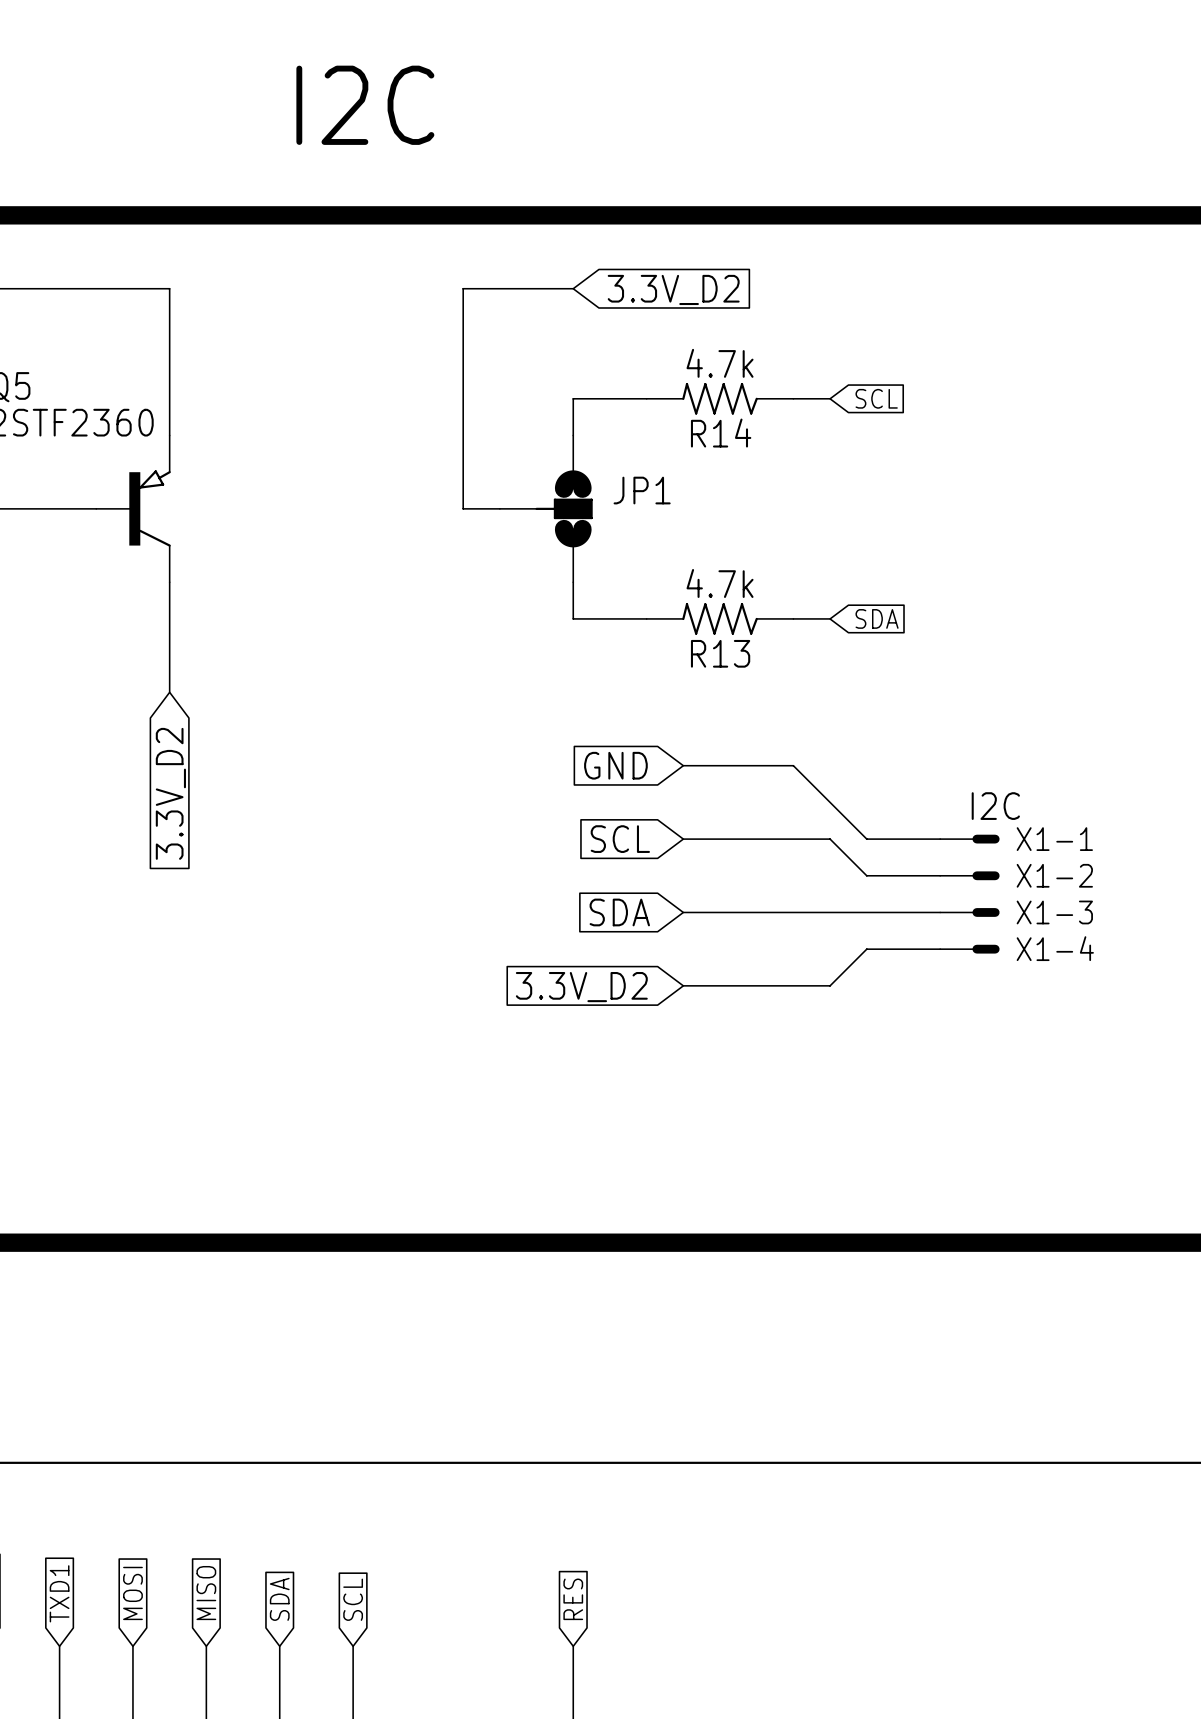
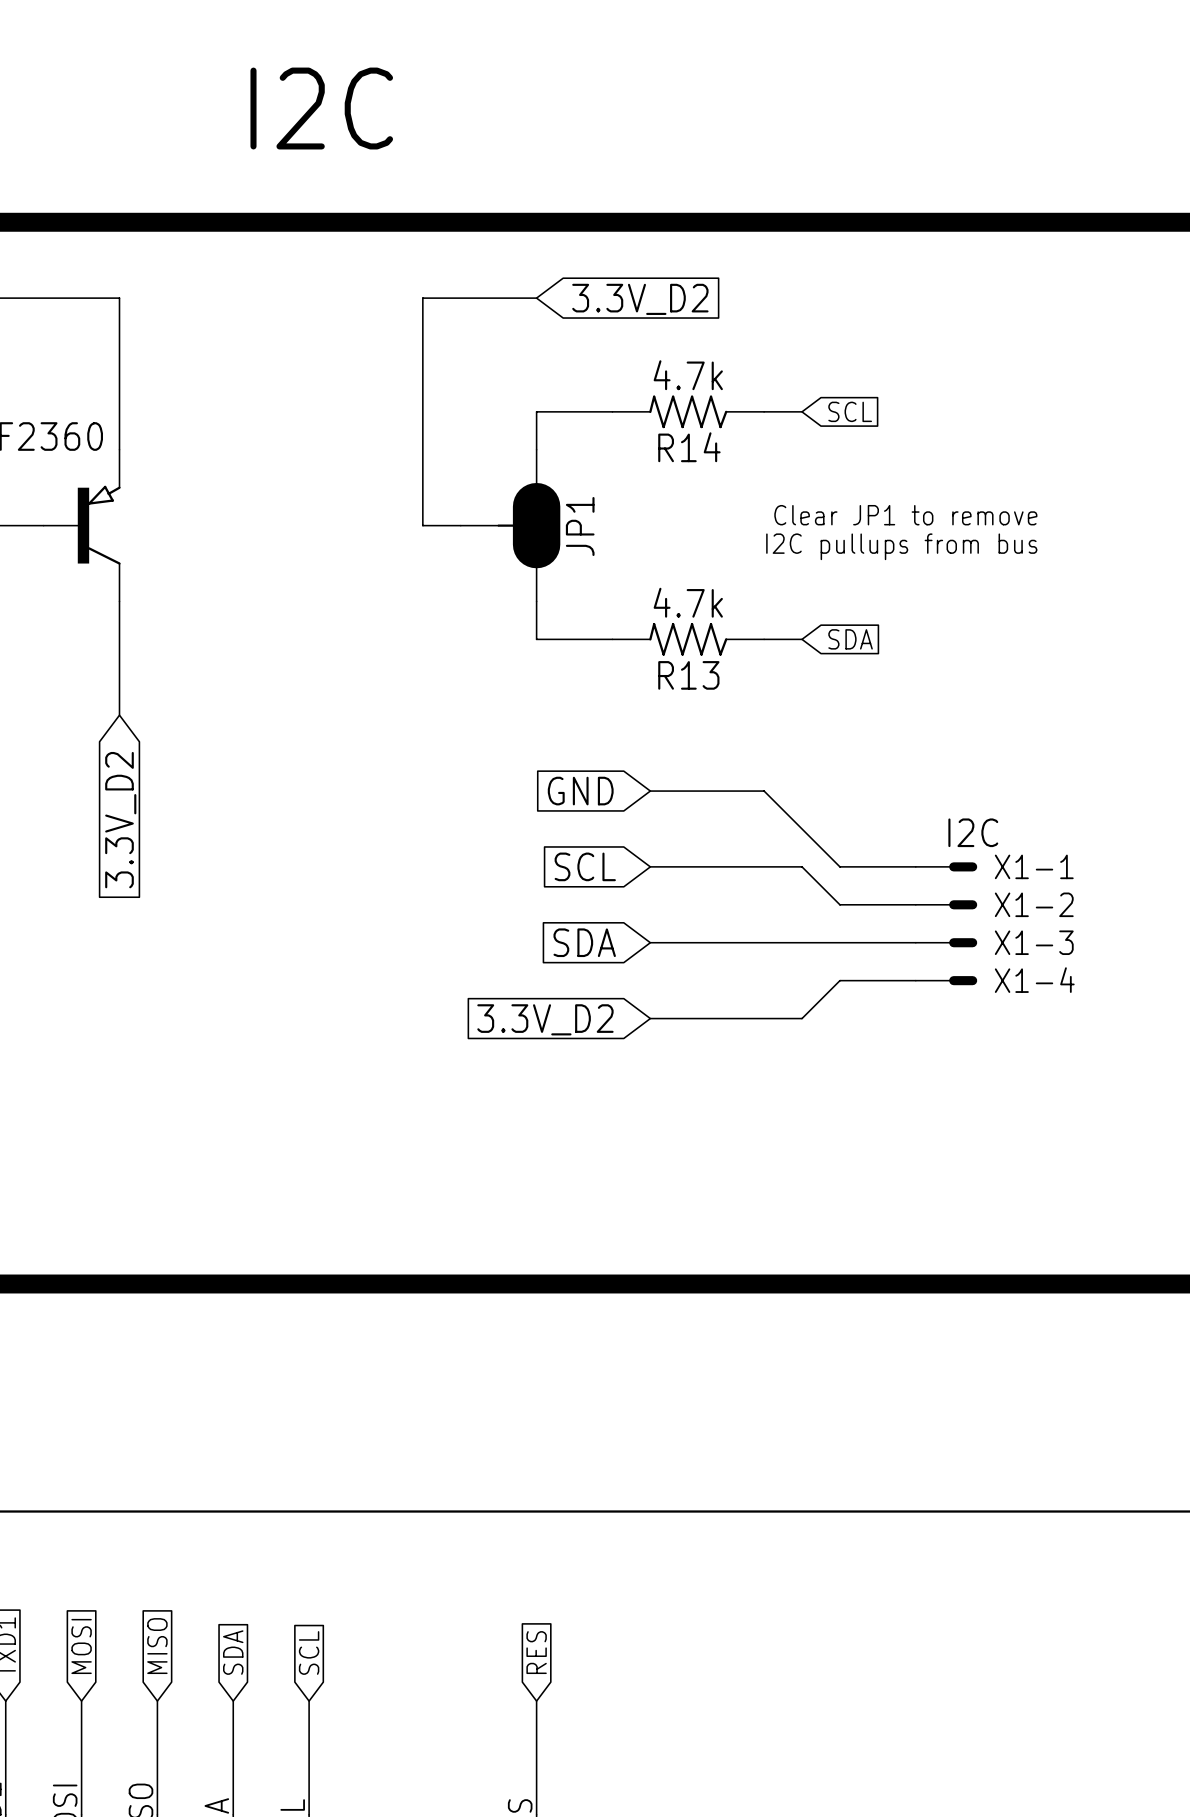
JP1 symbol: [499, 435, 593, 583] -> [460, 449, 561, 602]
JP1 name position: JP1 (642, 490) -> JP1 (580, 526)
text: none -> Clear JP1 to remove (905, 515)
text: none -> I2C pullups from bus (901, 546)

